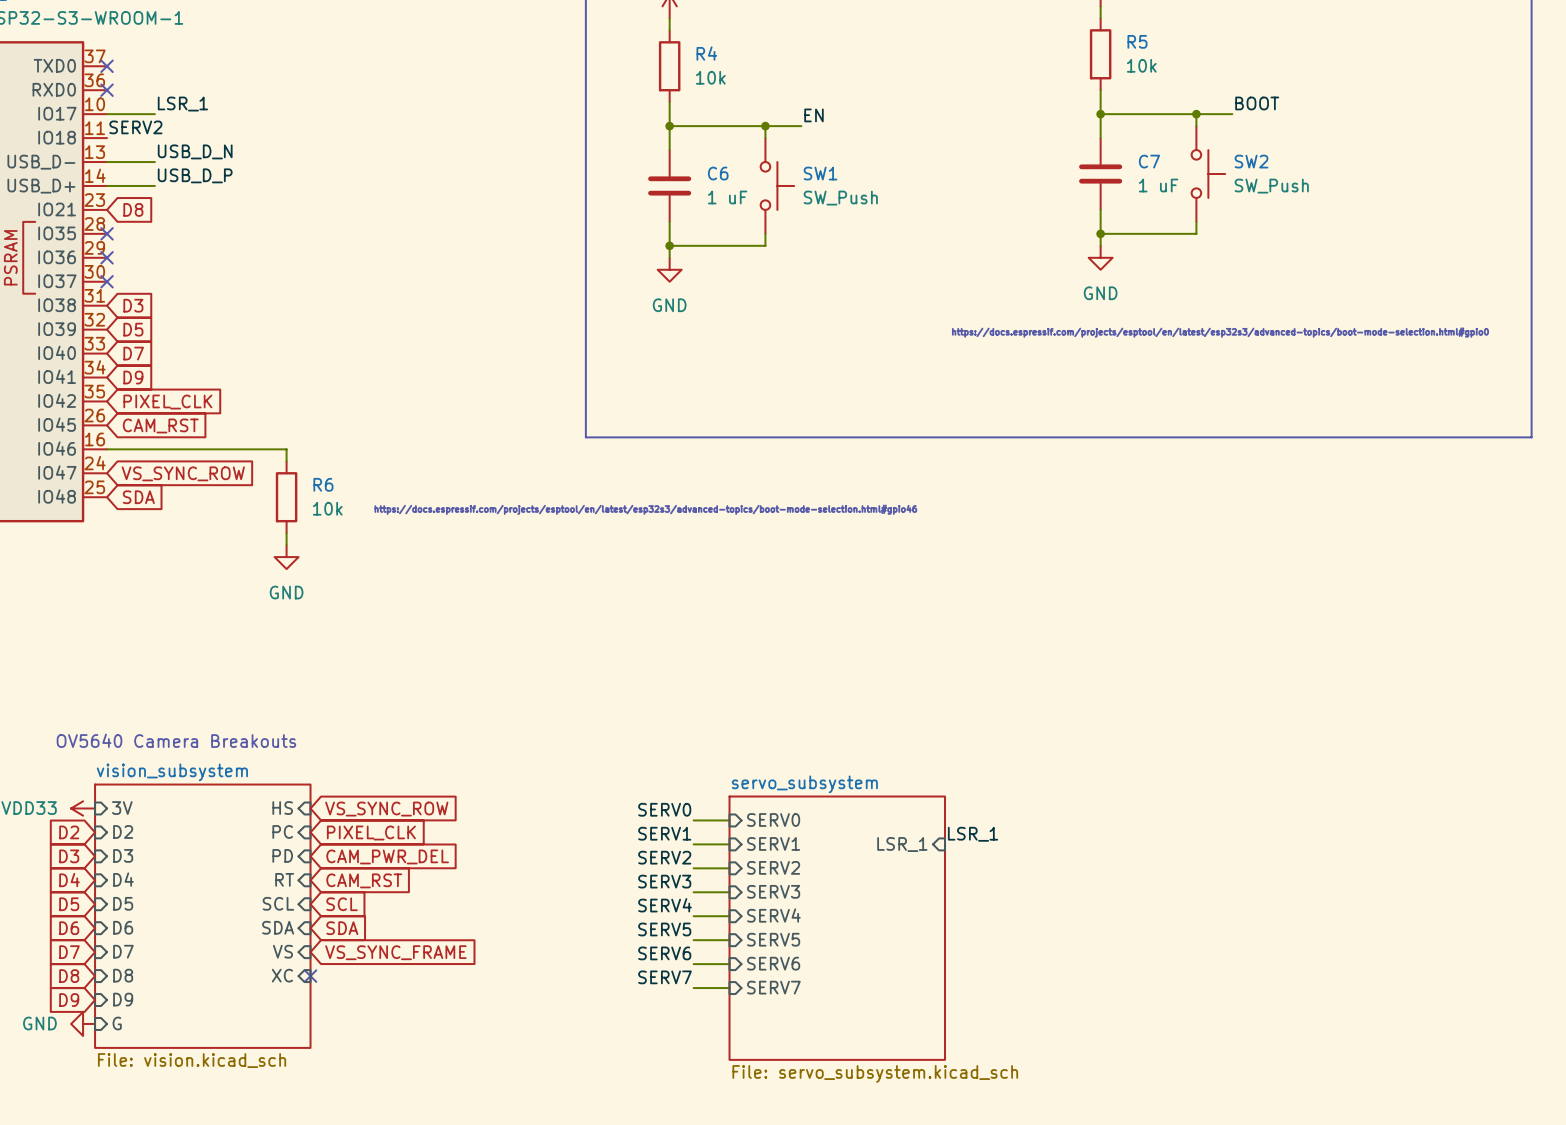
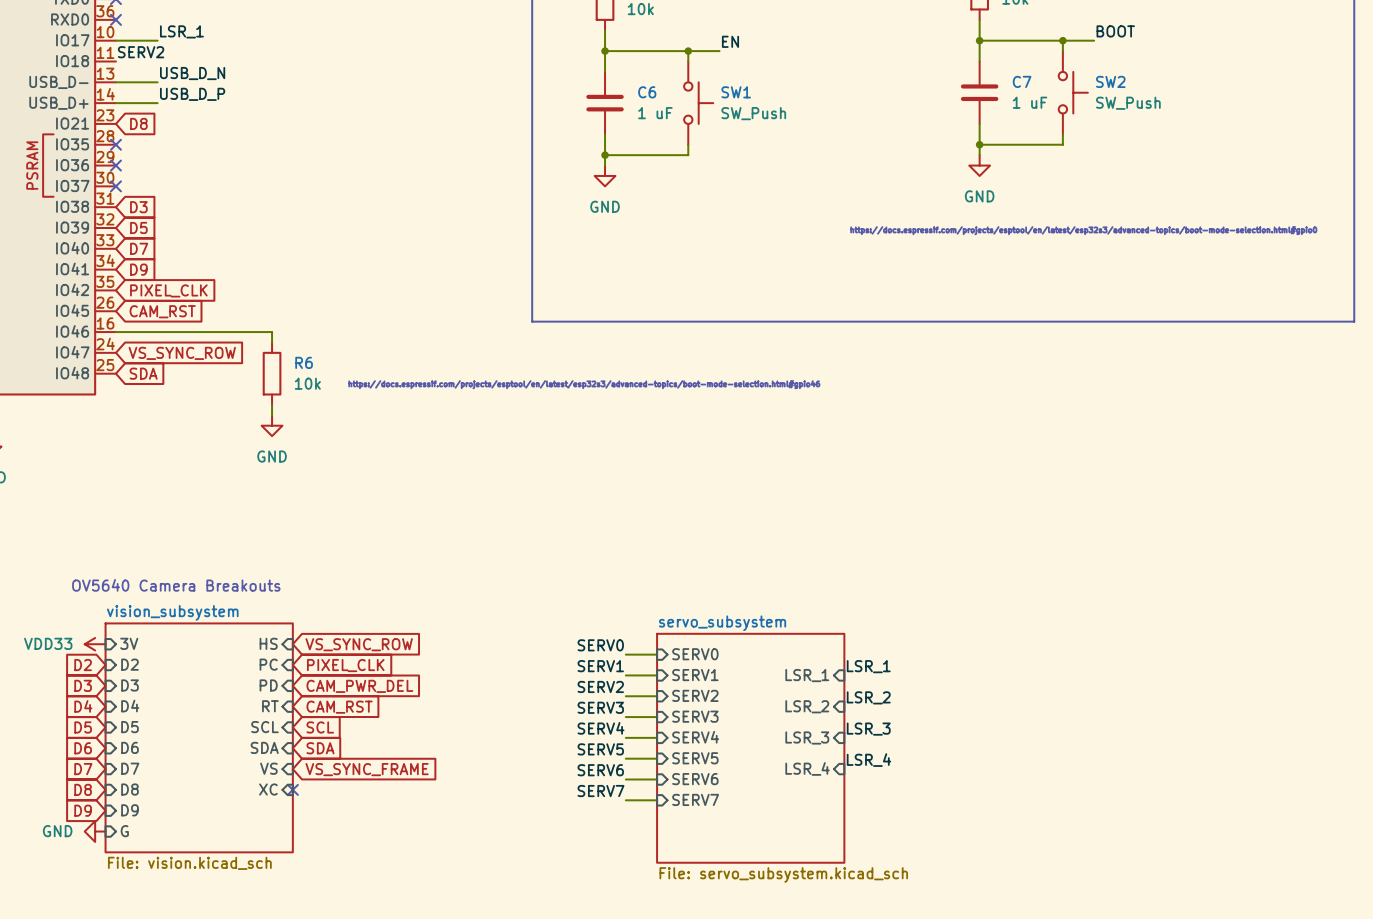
label: none -> LSR_2 (868, 697)
sheet pin: none -> LSR_2 (807, 706)
label: none -> LSR_3 (868, 729)
sheet pin: none -> LSR_3 (807, 737)
label: none -> LSR_4 (868, 760)
sheet pin: none -> LSR_4 (807, 768)

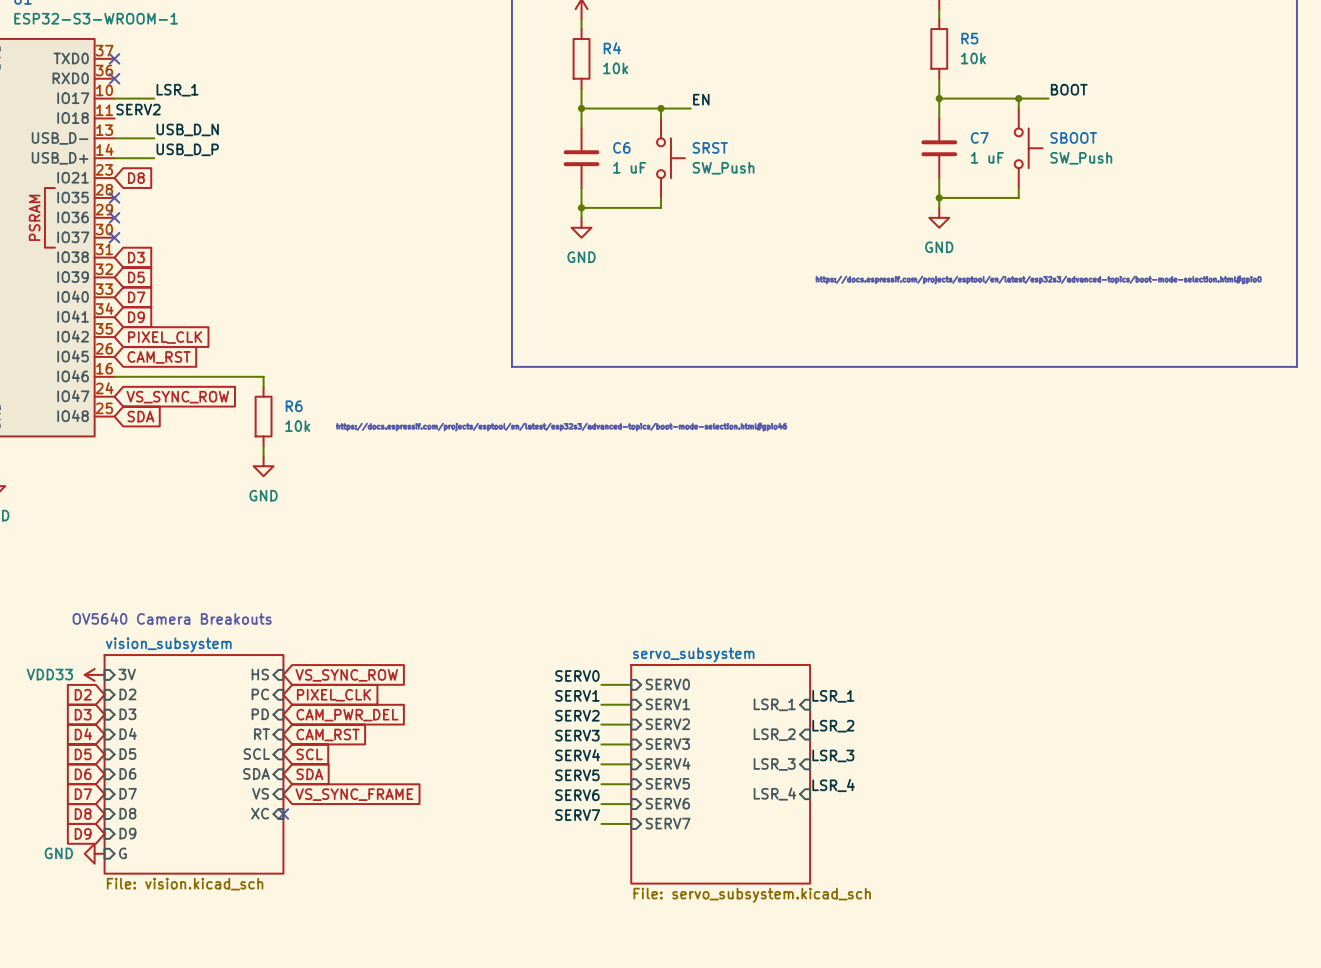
SW2 name: SW2 (1110, 81) -> SBOOT (1073, 137)
SW1 name: SW1 (736, 92) -> SRST (710, 147)

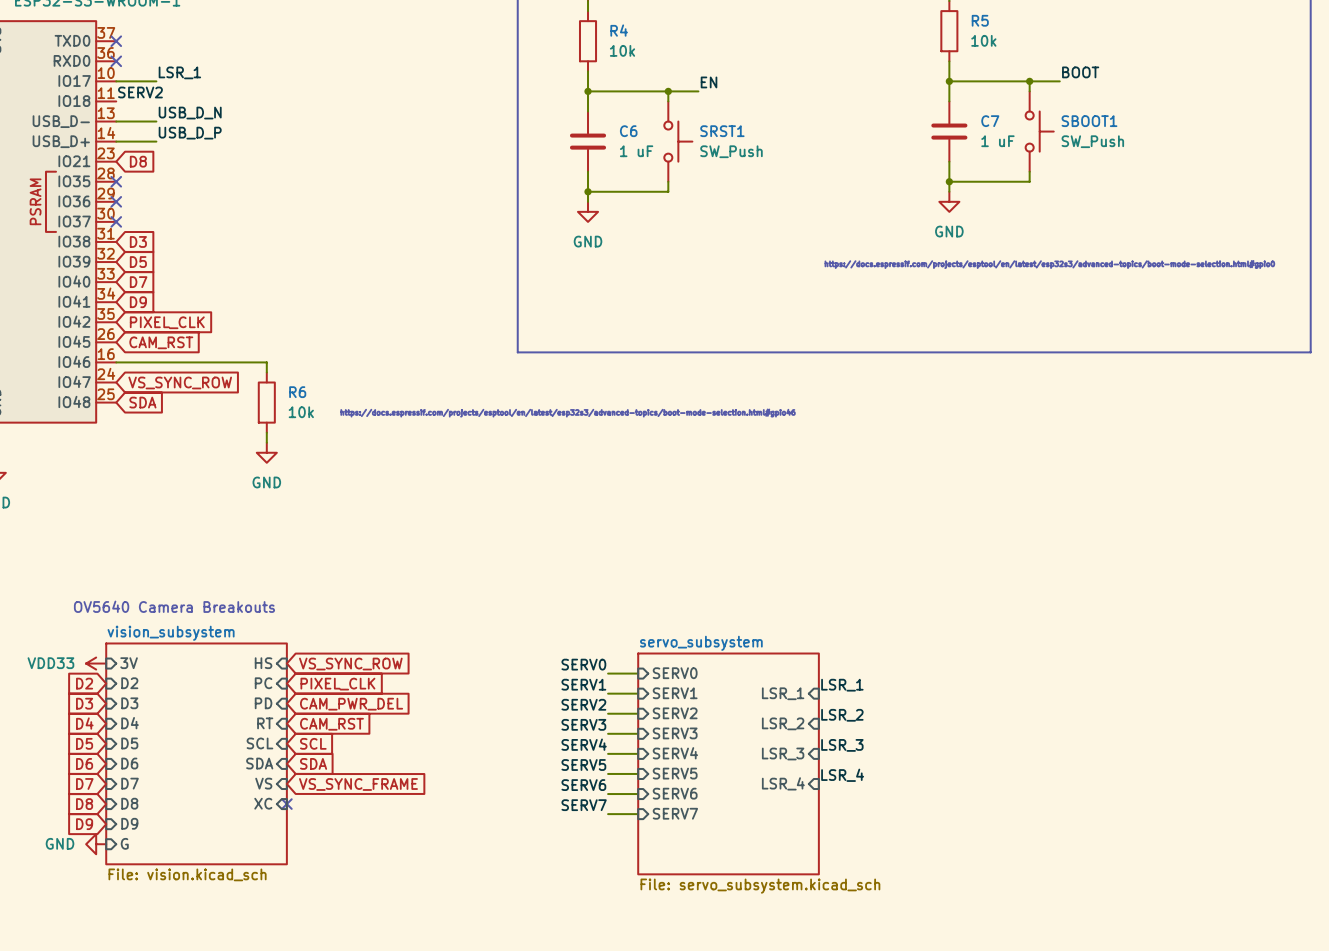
SBOOT name: SBOOT (1073, 137) -> SBOOT1 (1089, 121)
SRST name: SRST (710, 147) -> SRST1 (722, 131)

